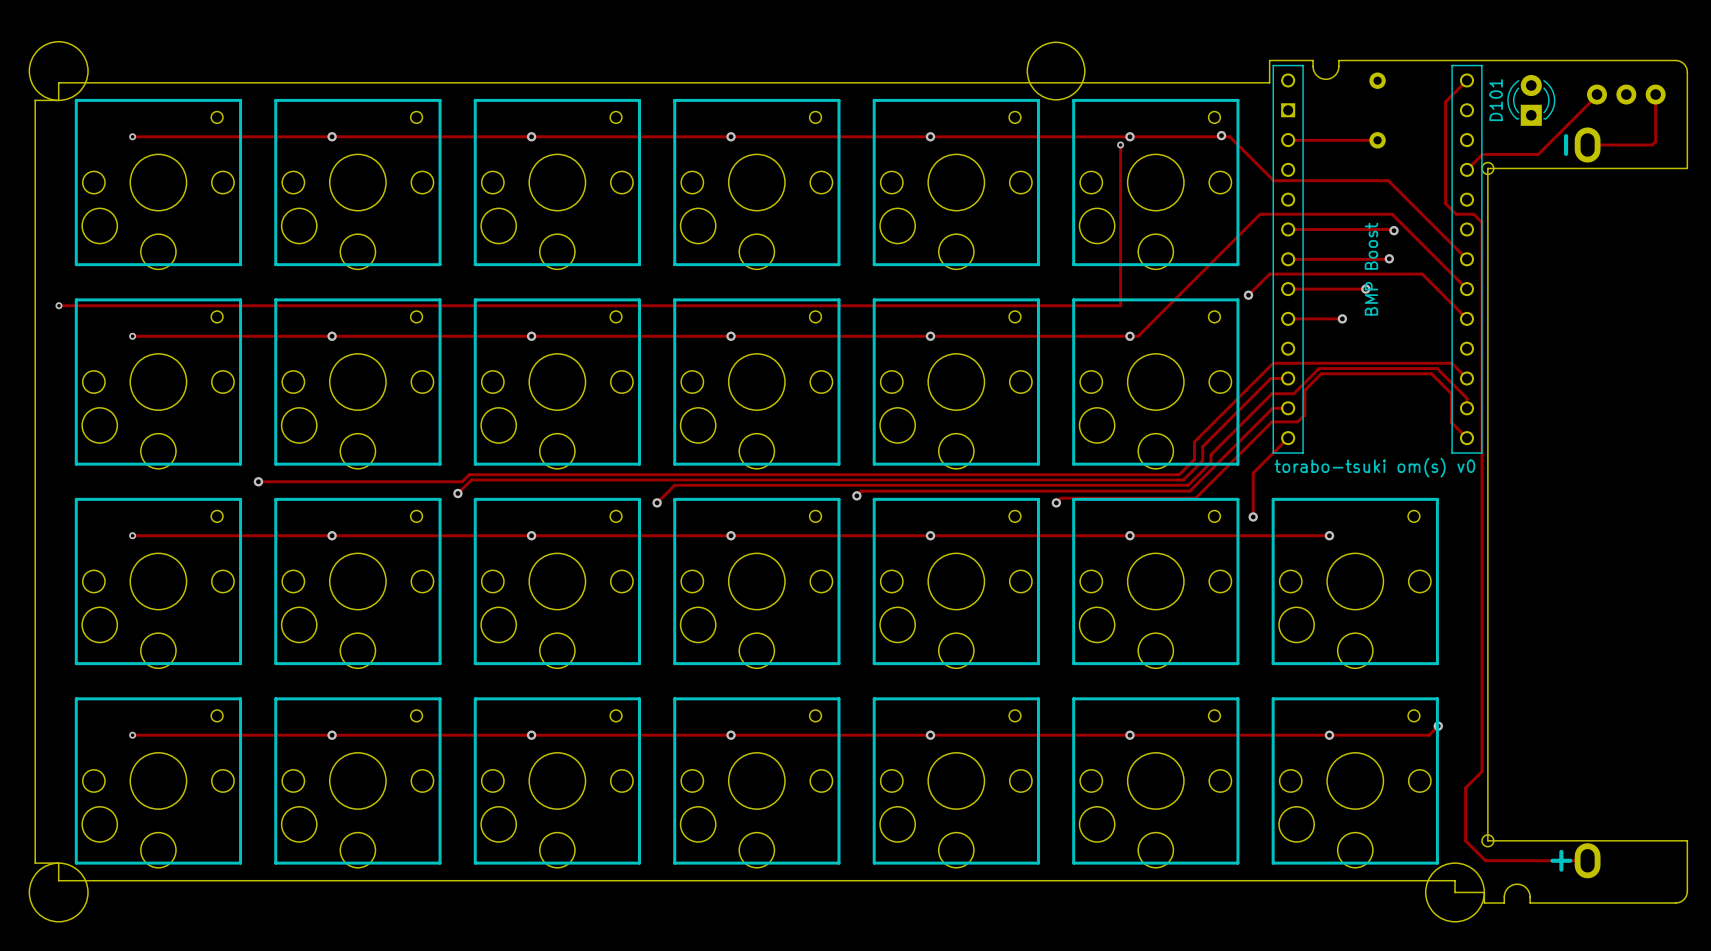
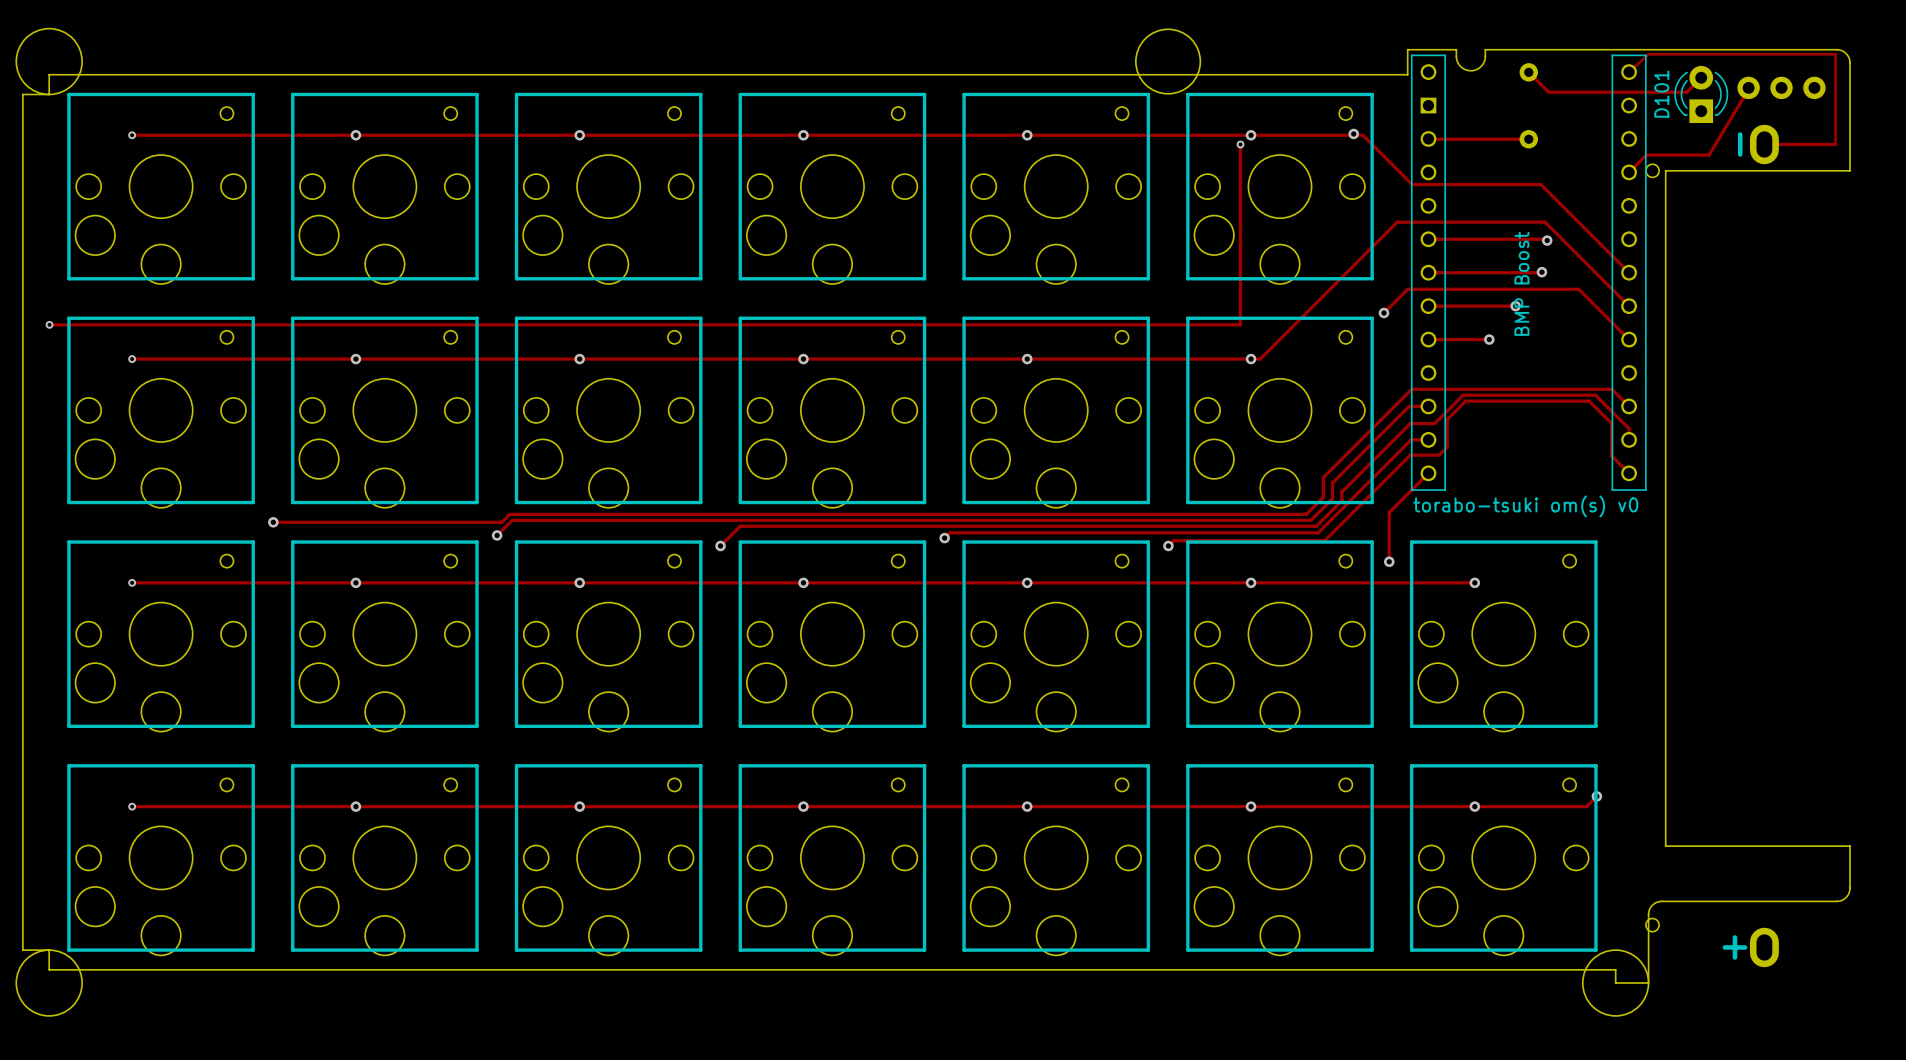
board edge: (1652, 60) (1679, 61) (1684, 64) (1687, 70) (1687, 168) (1663, 168) -> (1836, 49) (1845, 52) (1849, 61) (1849, 170)
track: none -> (1528, 72) (1548, 92) (1686, 92) (1701, 77)
track: (1466, 80) (1445, 101) (1445, 203) (1456, 214) (1473, 214) (1482, 222) (1482, 771) (1465, 788) (1465, 840) (1485, 860) (1587, 860) -> none
track: (1597, 94) (1538, 154) -> (1748, 87) (1709, 155)
part position: (1626, 94) -> (1781, 87)
track: (1655, 94) (1655, 141) (1650, 144) -> (1629, 72) (1648, 54) (1835, 54) (1835, 144)
board edge: (1499, 168) (1487, 168) (1487, 840) (1687, 840) (1687, 891) (1683, 899) (1675, 903) (1530, 903) (1527, 889) (1517, 884) (1506, 889) (1504, 903) (1484, 903) (1484, 892) -> (1665, 170) (1665, 846) (1849, 846) (1849, 888) (1846, 897) (1838, 901) (1656, 902) (1650, 907) (1648, 913) (1648, 983)

